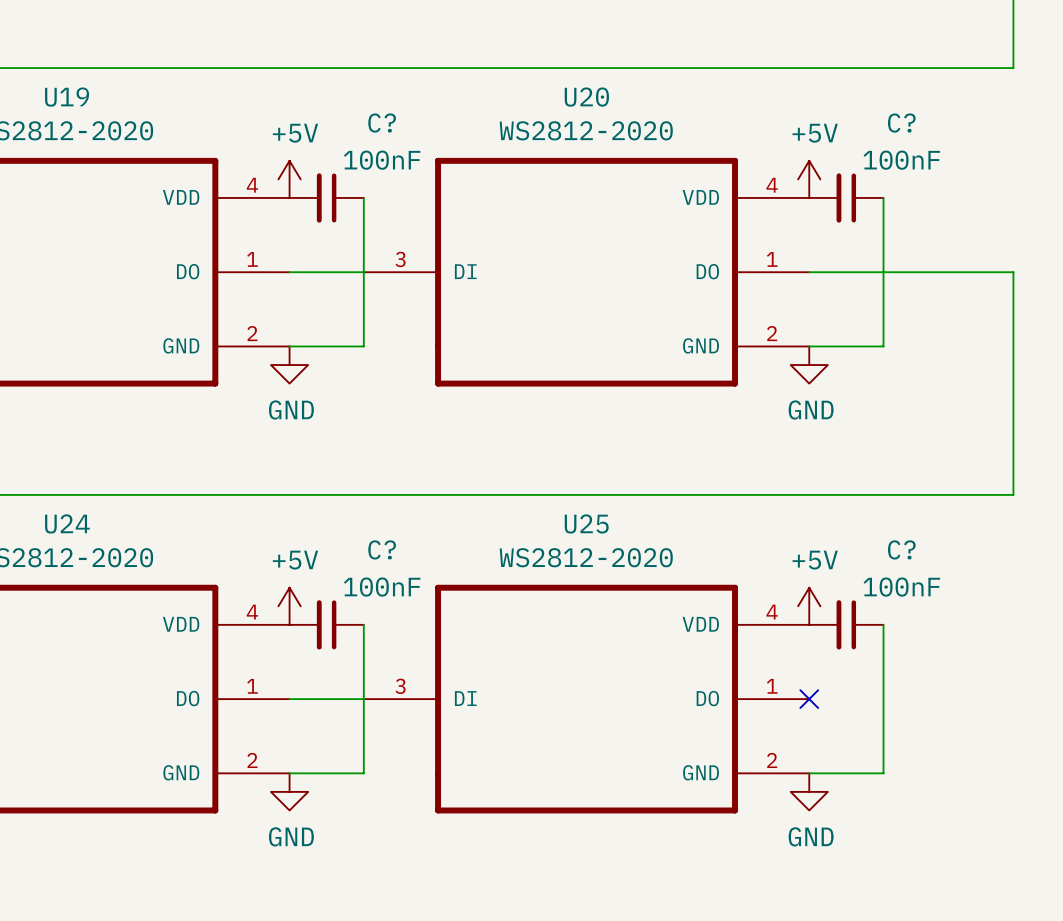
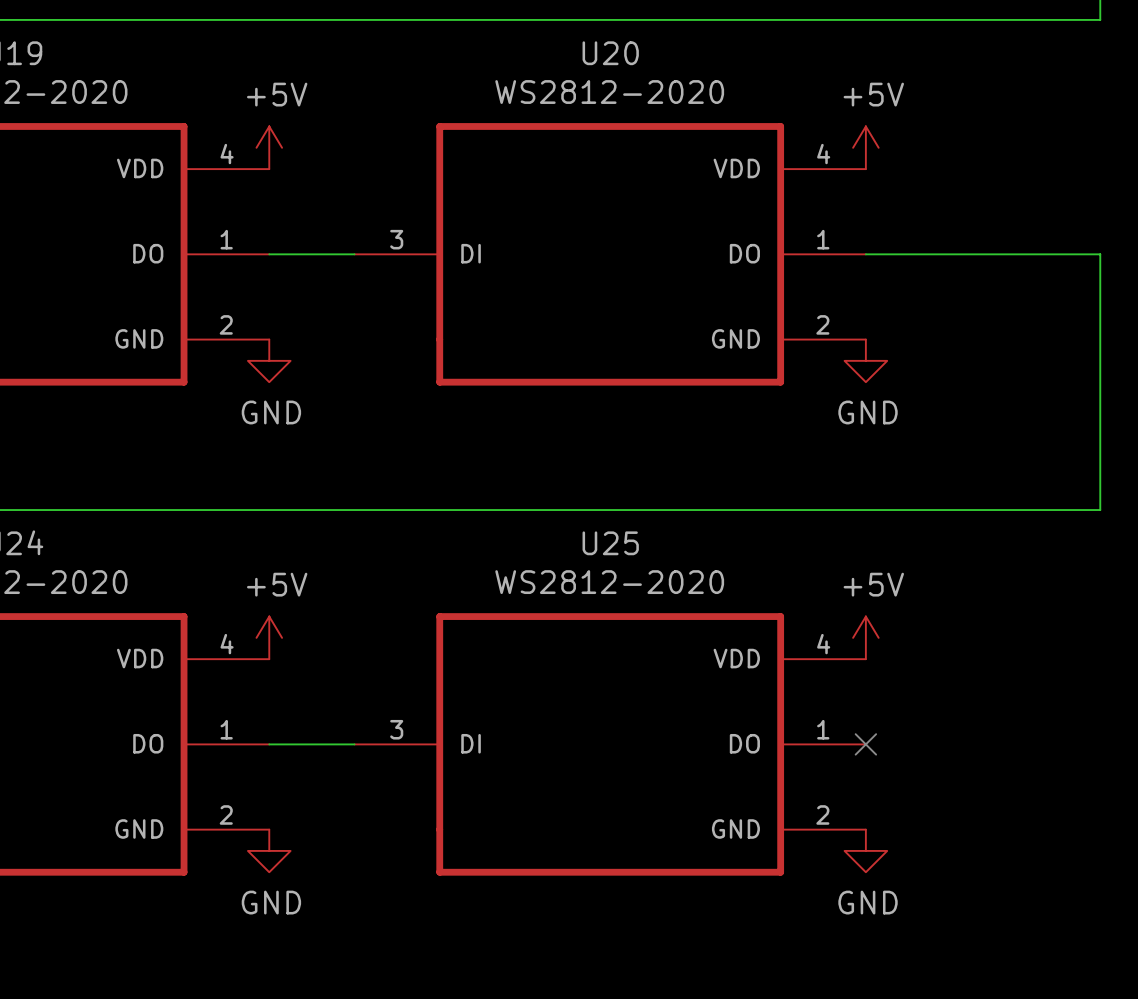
C?: 100nF (326, 197) -> none
wire: (363, 197) (363, 346) (289, 346) -> none
C?: 100nF (846, 197) -> none
wire: (883, 197) (883, 346) (809, 346) -> none
C?: 100nF (326, 624) -> none
wire: (363, 624) (363, 773) (289, 773) -> none
C?: 100nF (846, 624) -> none
wire: (883, 624) (883, 773) (809, 773) -> none

